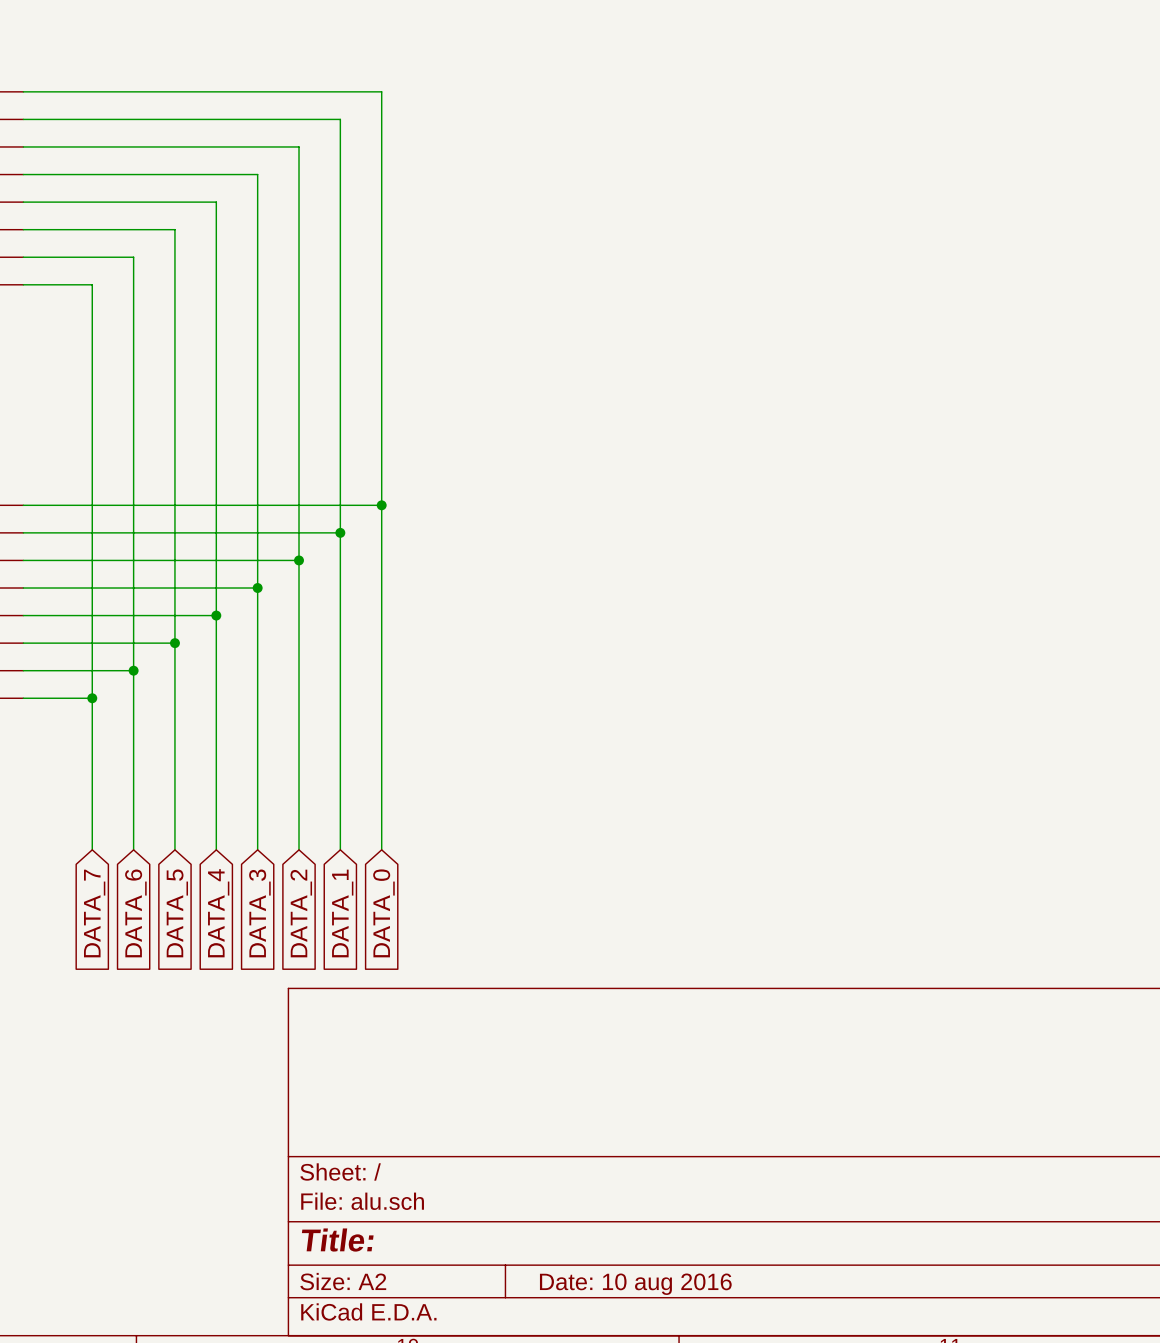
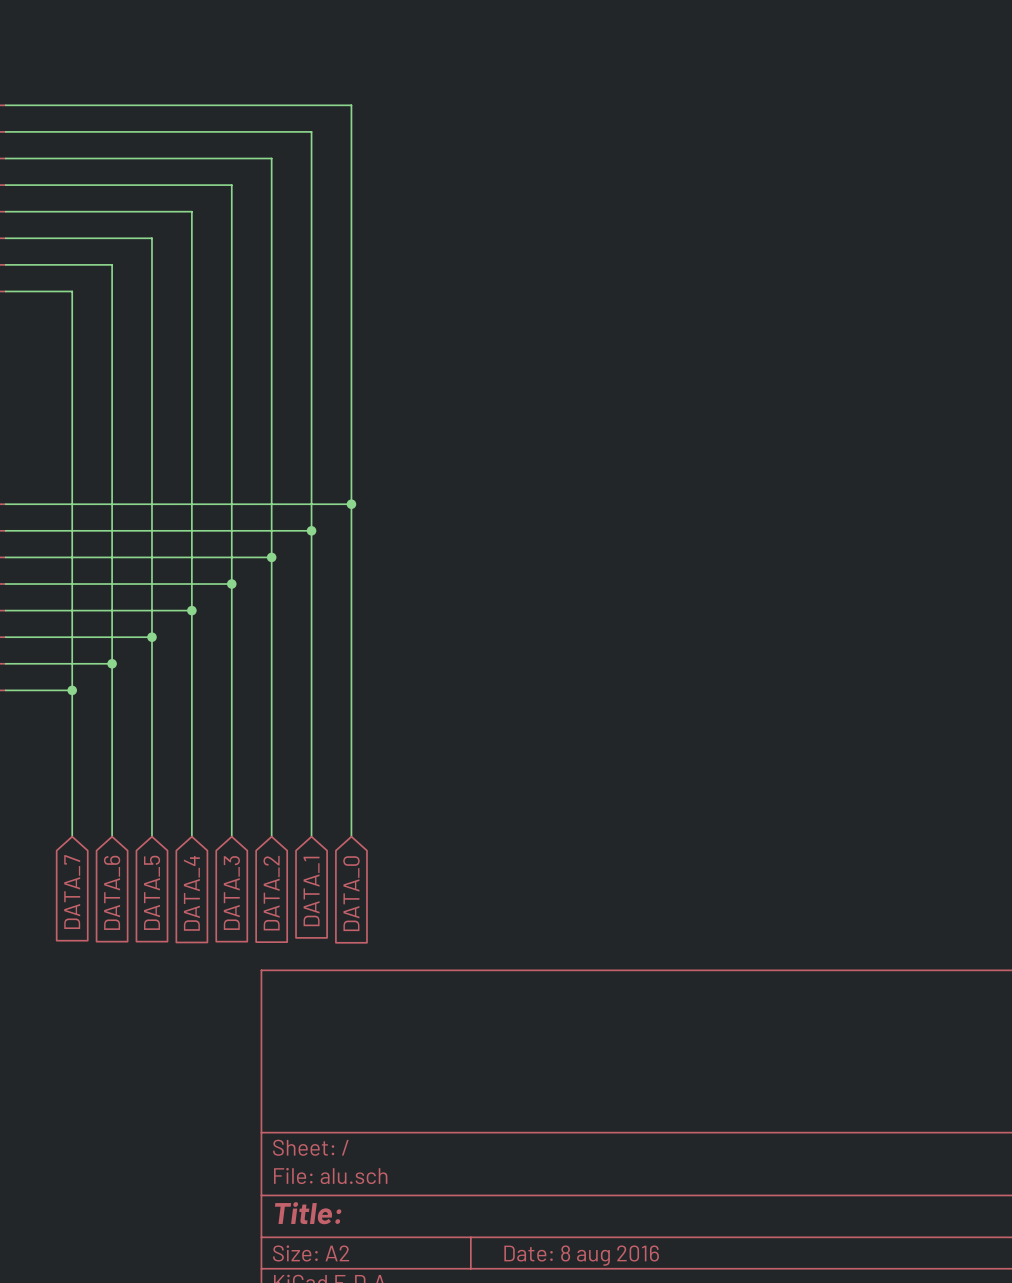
title block: Date: 10 aug 2016 (635, 1284) -> Date: 8 aug 2016 (581, 1255)

